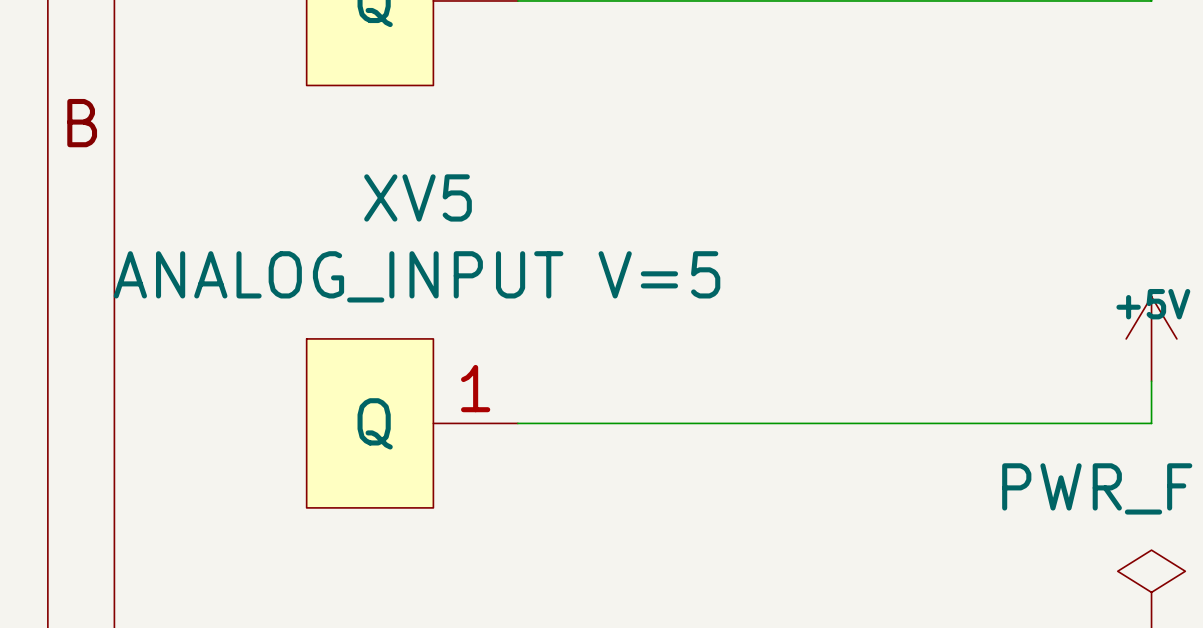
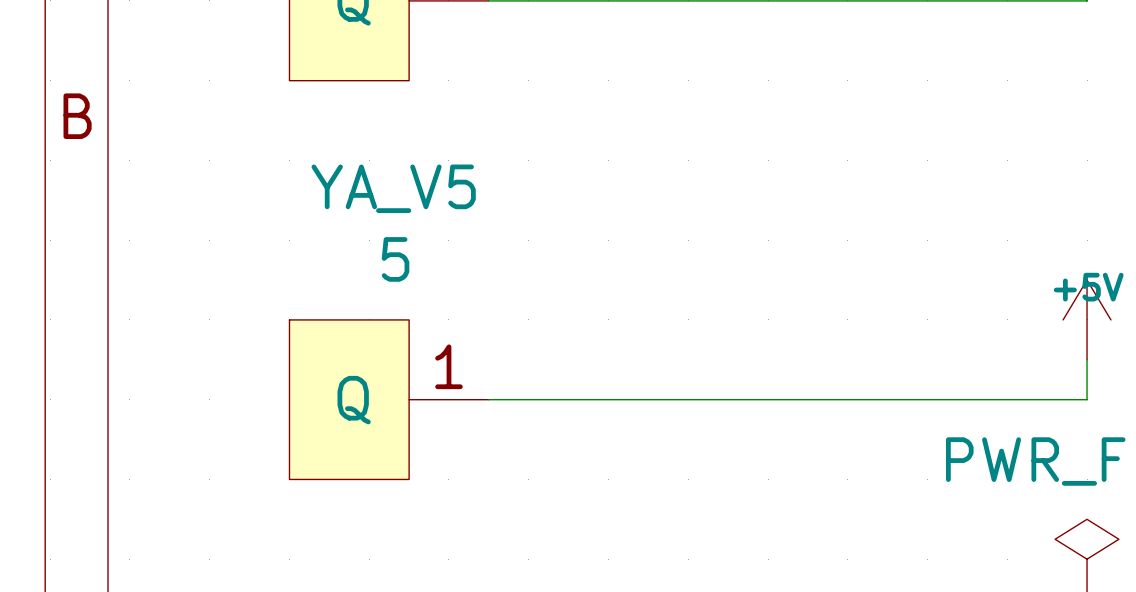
XV5 name: XV5 (418, 197) -> YA_V5 (393, 188)
XV5 value: ANALOG_INPUT V=5 (417, 276) -> 5 (395, 259)

